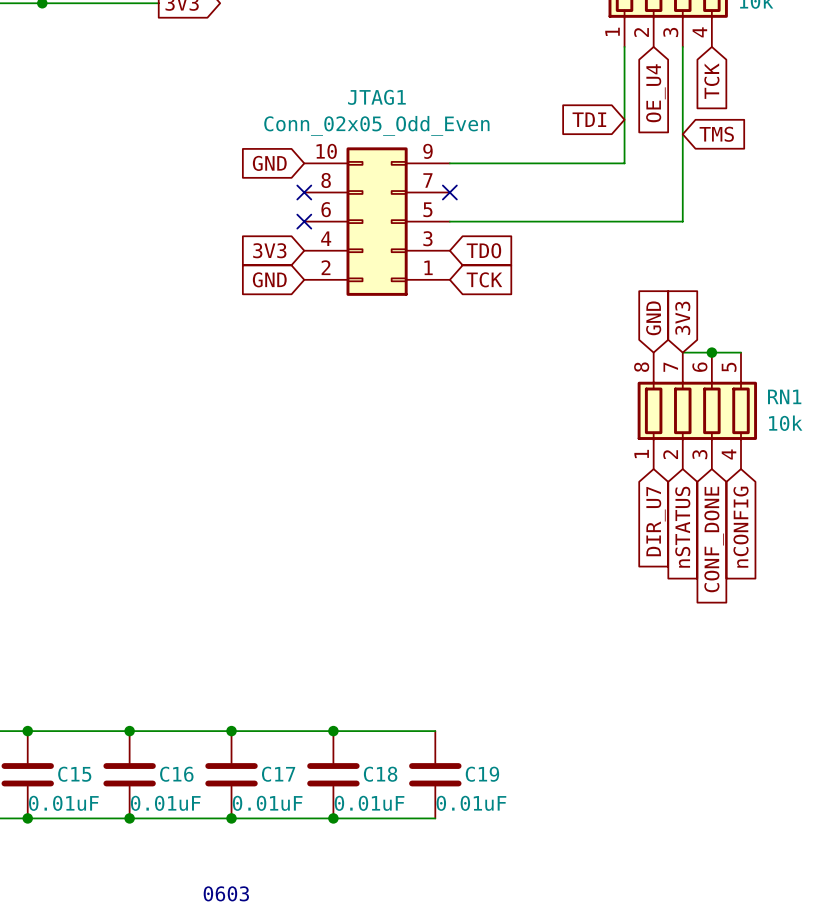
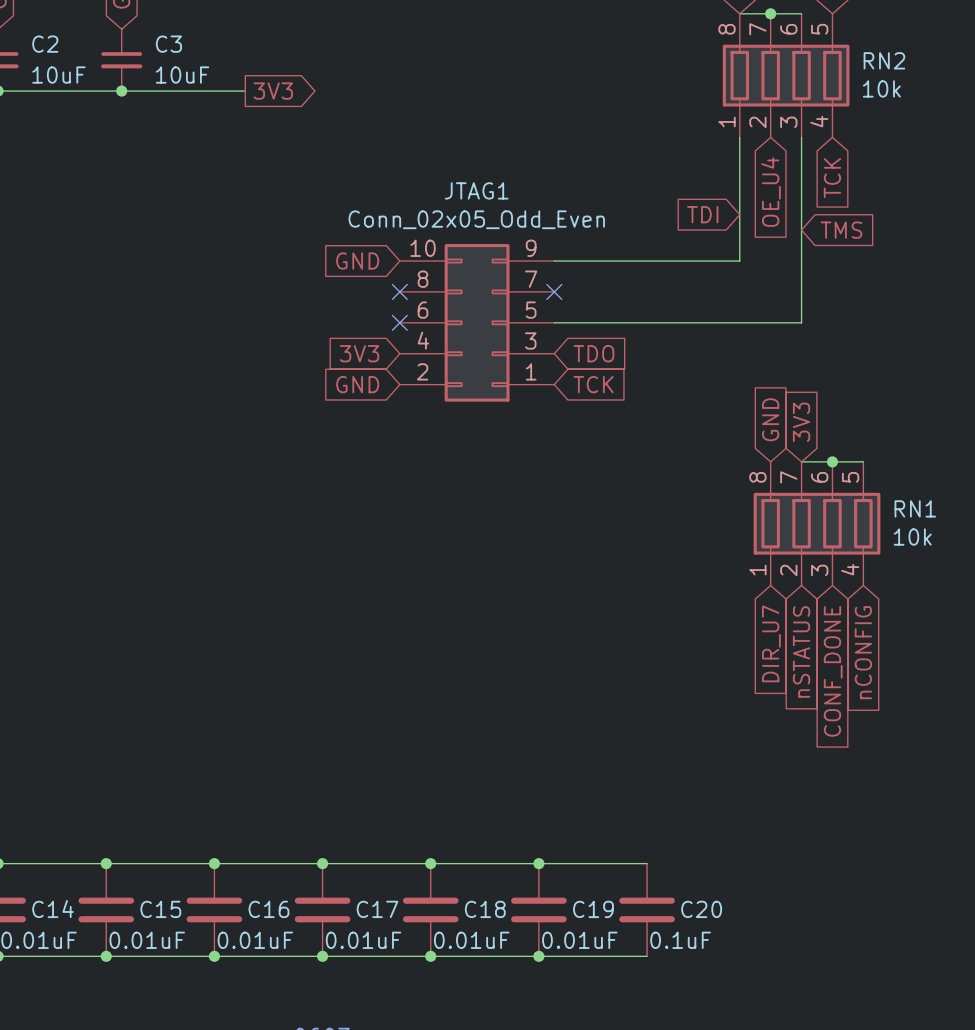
wire: none -> (538, 863) (647, 863)
junction: none -> (538, 863)
C20: none -> 0.1uF (647, 909)
wire: none -> (538, 956) (647, 956)
junction: none -> (538, 956)

